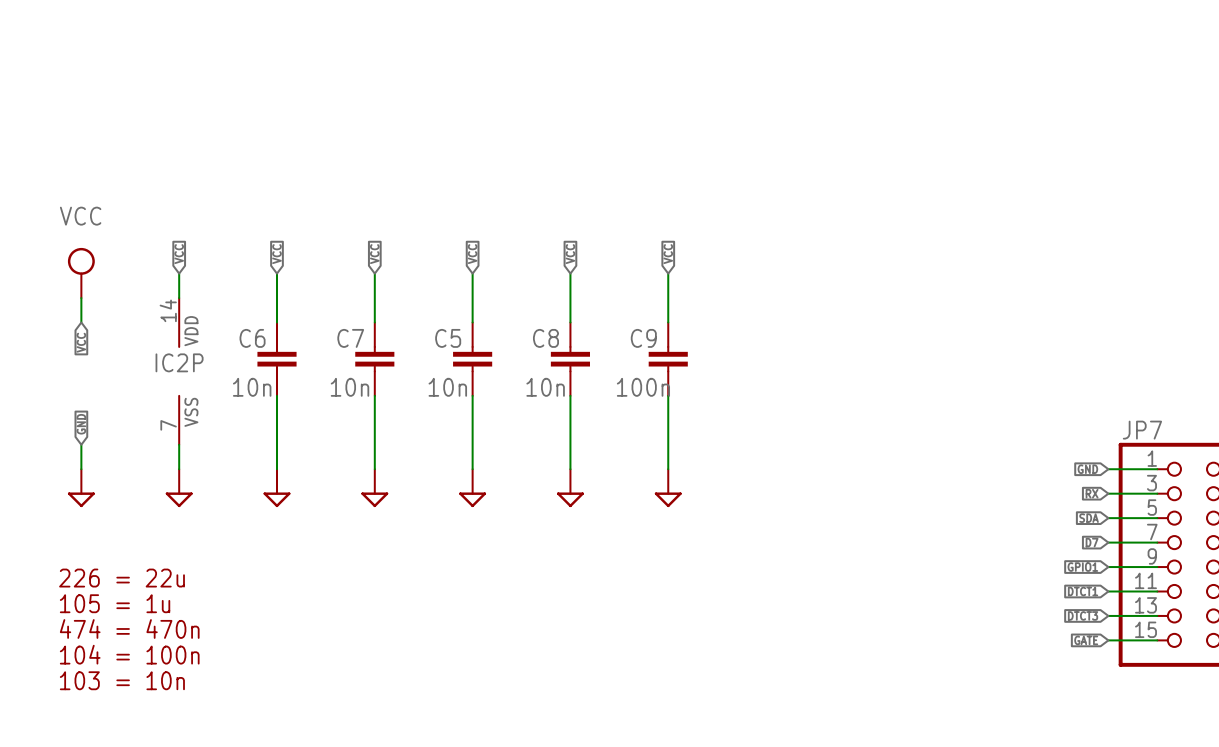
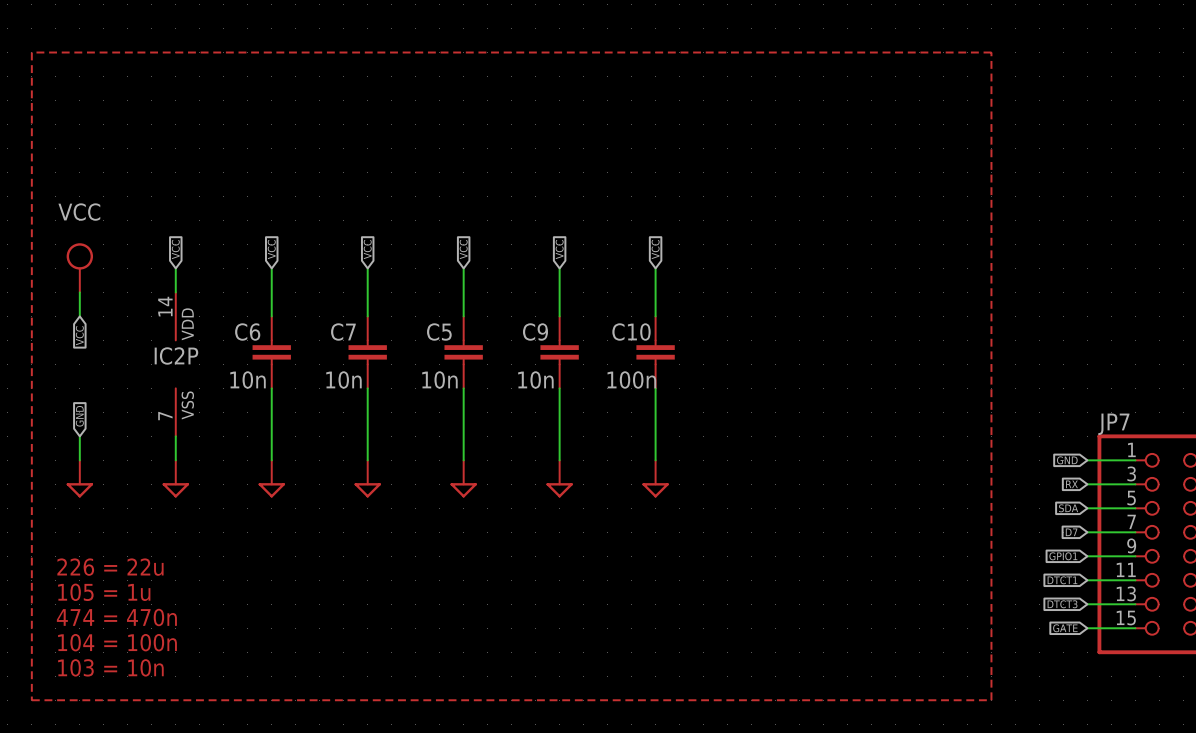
line: none -> (31, 52) (31, 700) (991, 700) (991, 52) (31, 52)
C8 name: C8 (545, 338) -> C9 (535, 332)
C9 name: C9 (643, 338) -> C10 (631, 332)

